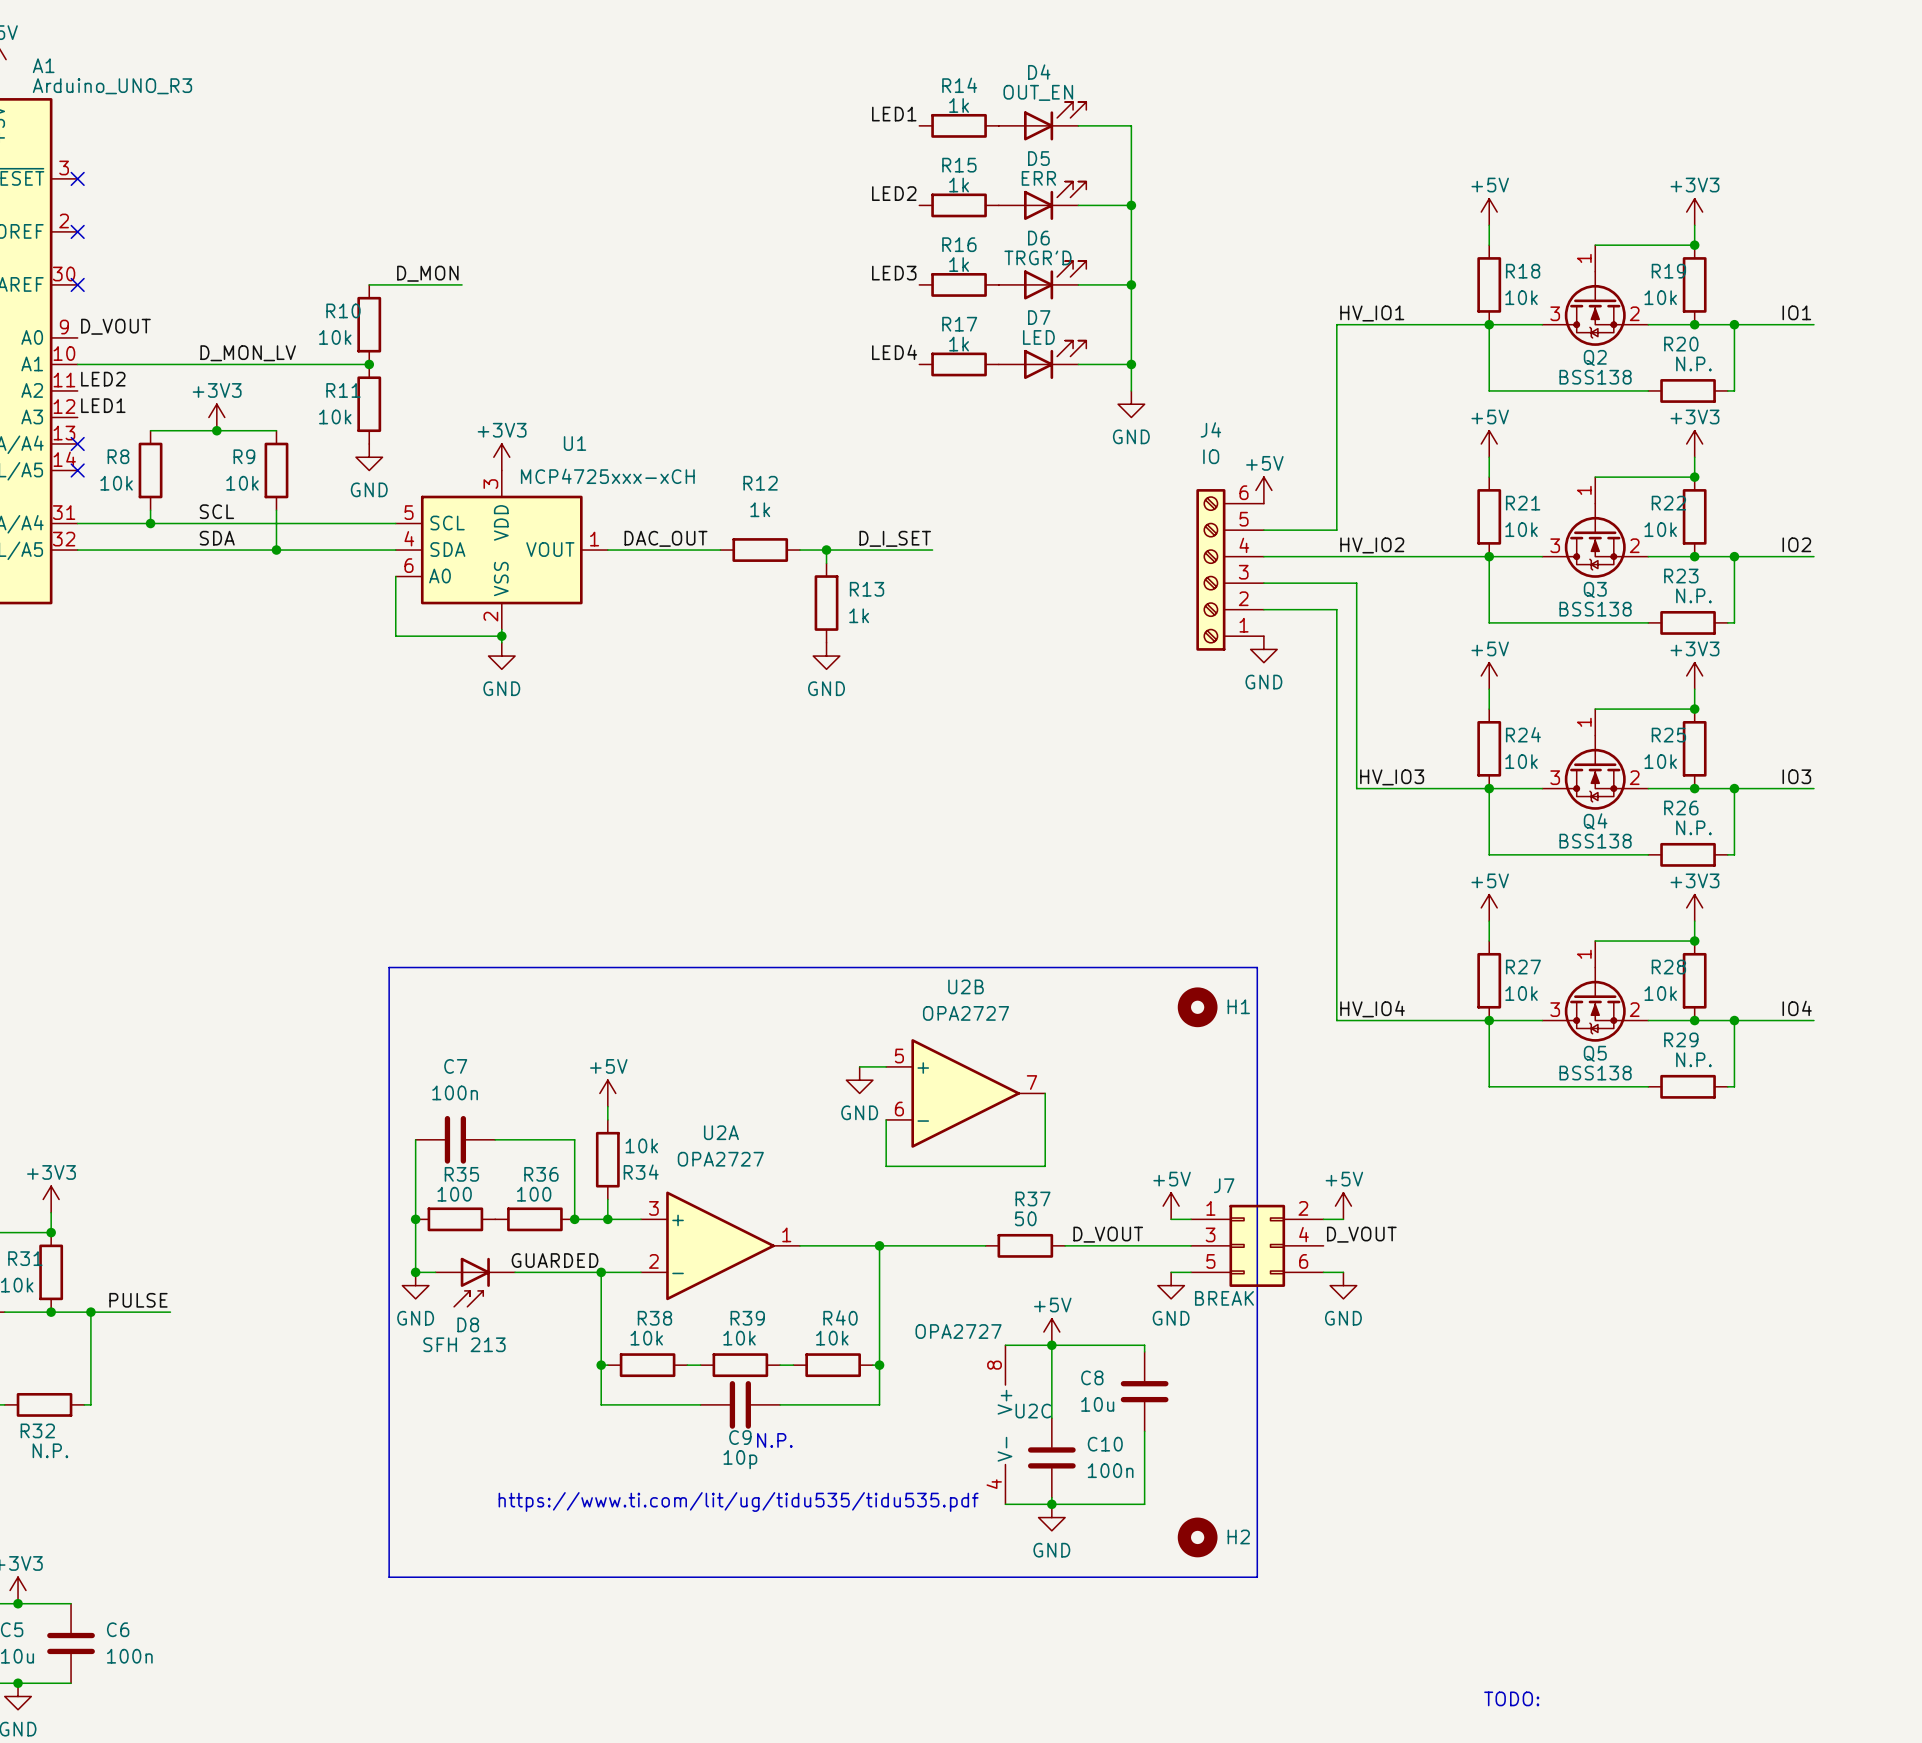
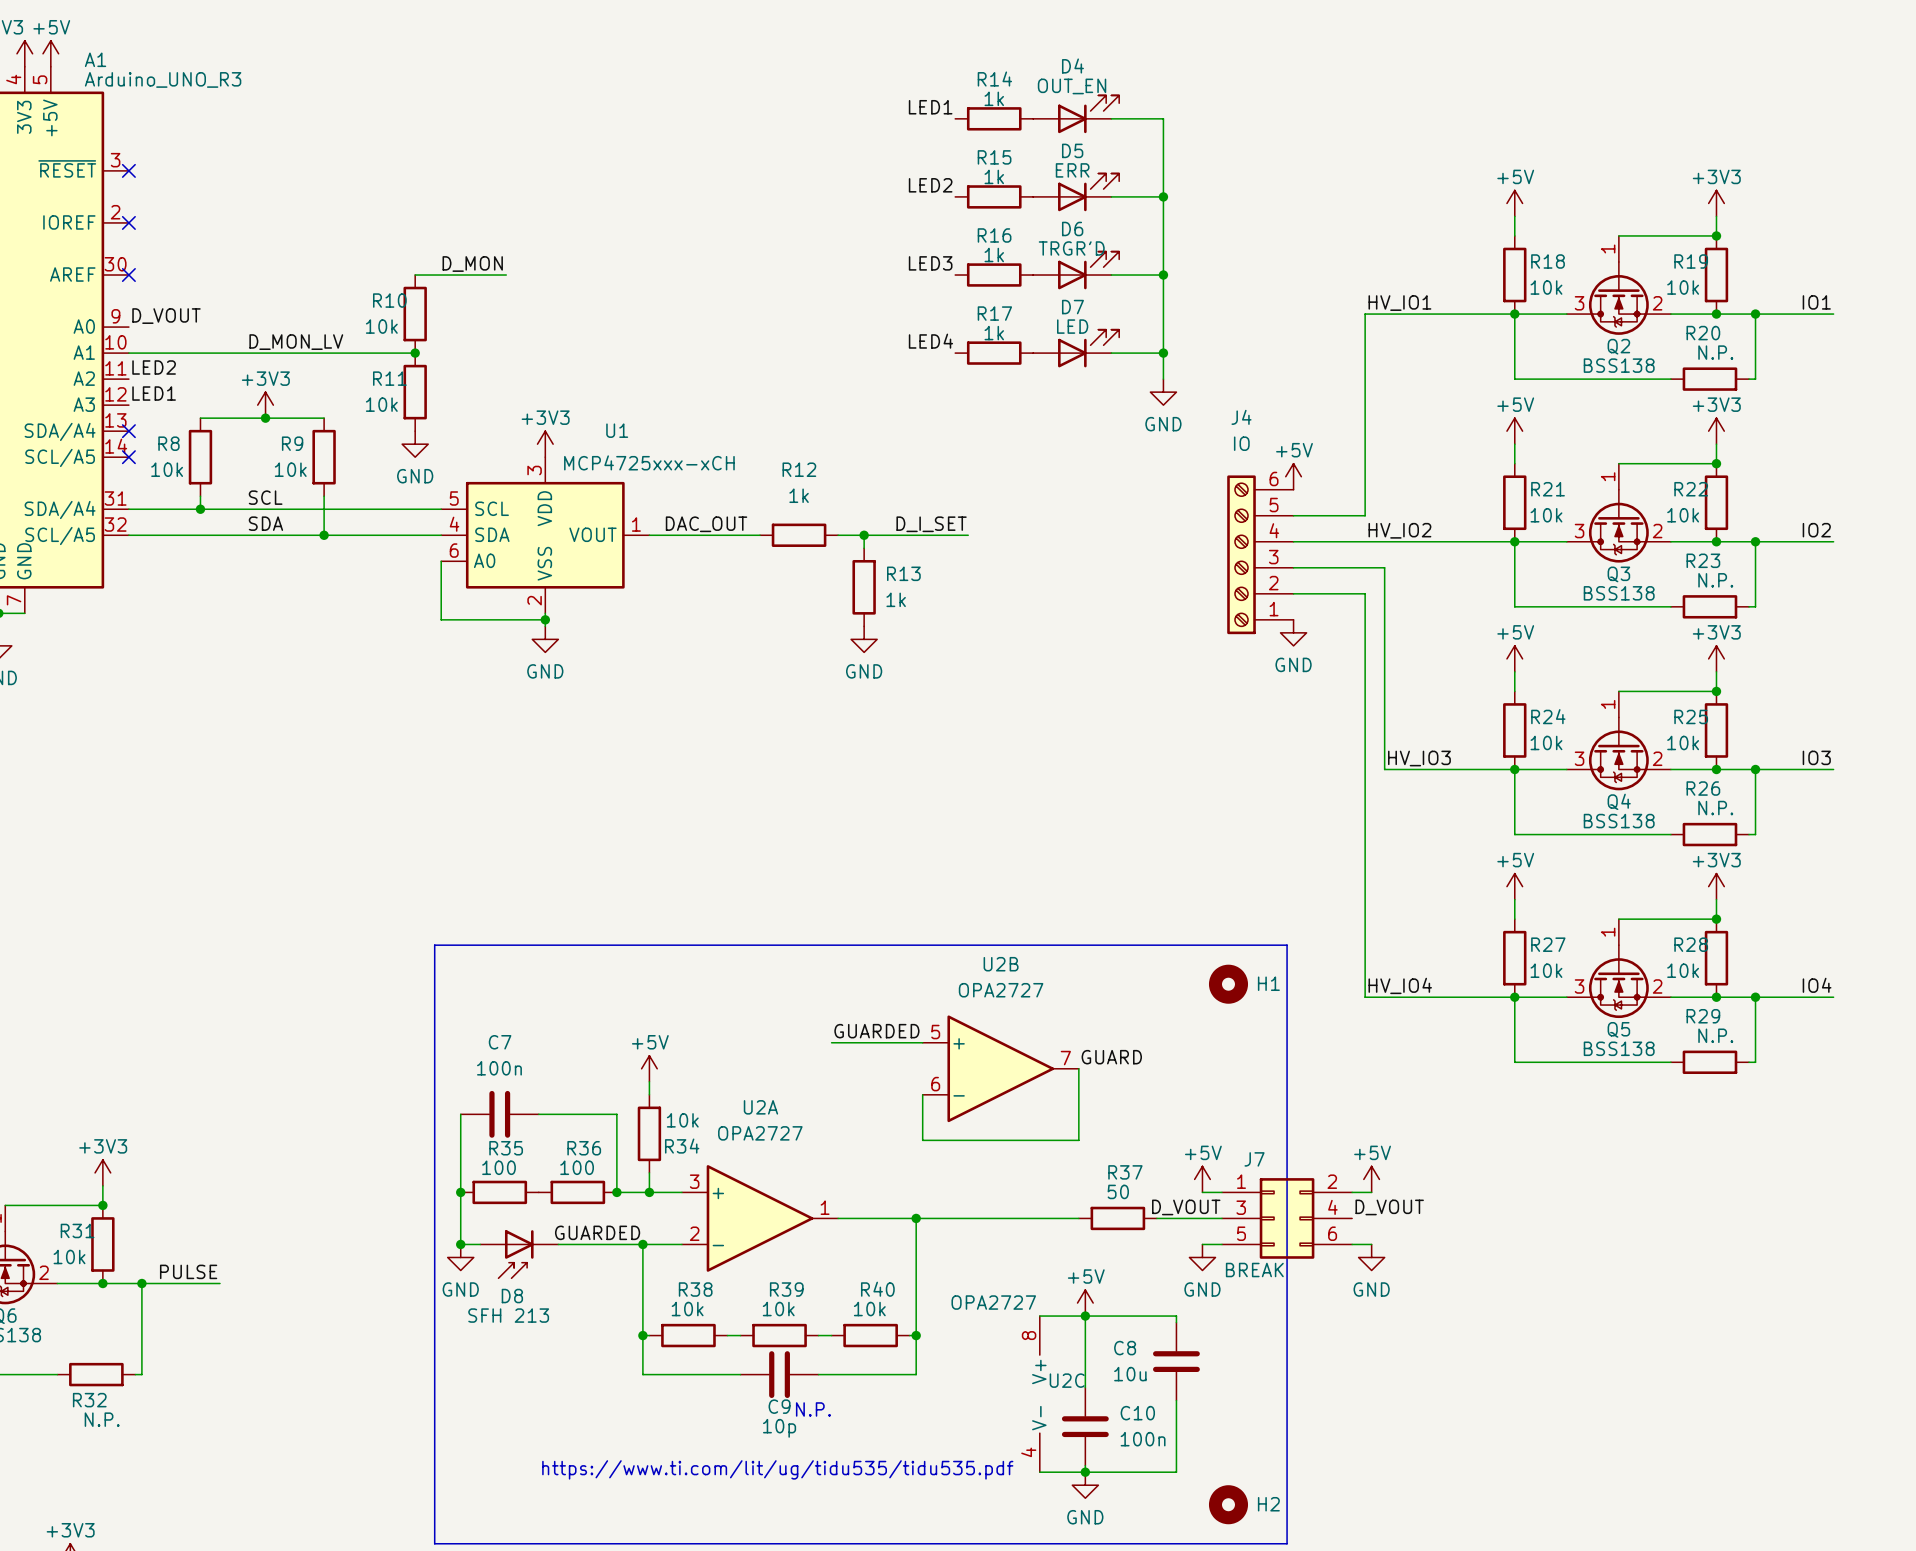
label: none -> GUARDED (876, 1031)
wire: none -> (831, 1042) (896, 1042)
power symbol: GND (859, 1080) -> none
label: none -> GUARD (1111, 1057)
label position: D_VOUT (1108, 1234) -> D_VOUT (1186, 1207)
R37 position: (1025, 1245) -> (1117, 1218)
wire: (1065, 1245) (1124, 1245) -> (1020, 1218) (1078, 1218)

